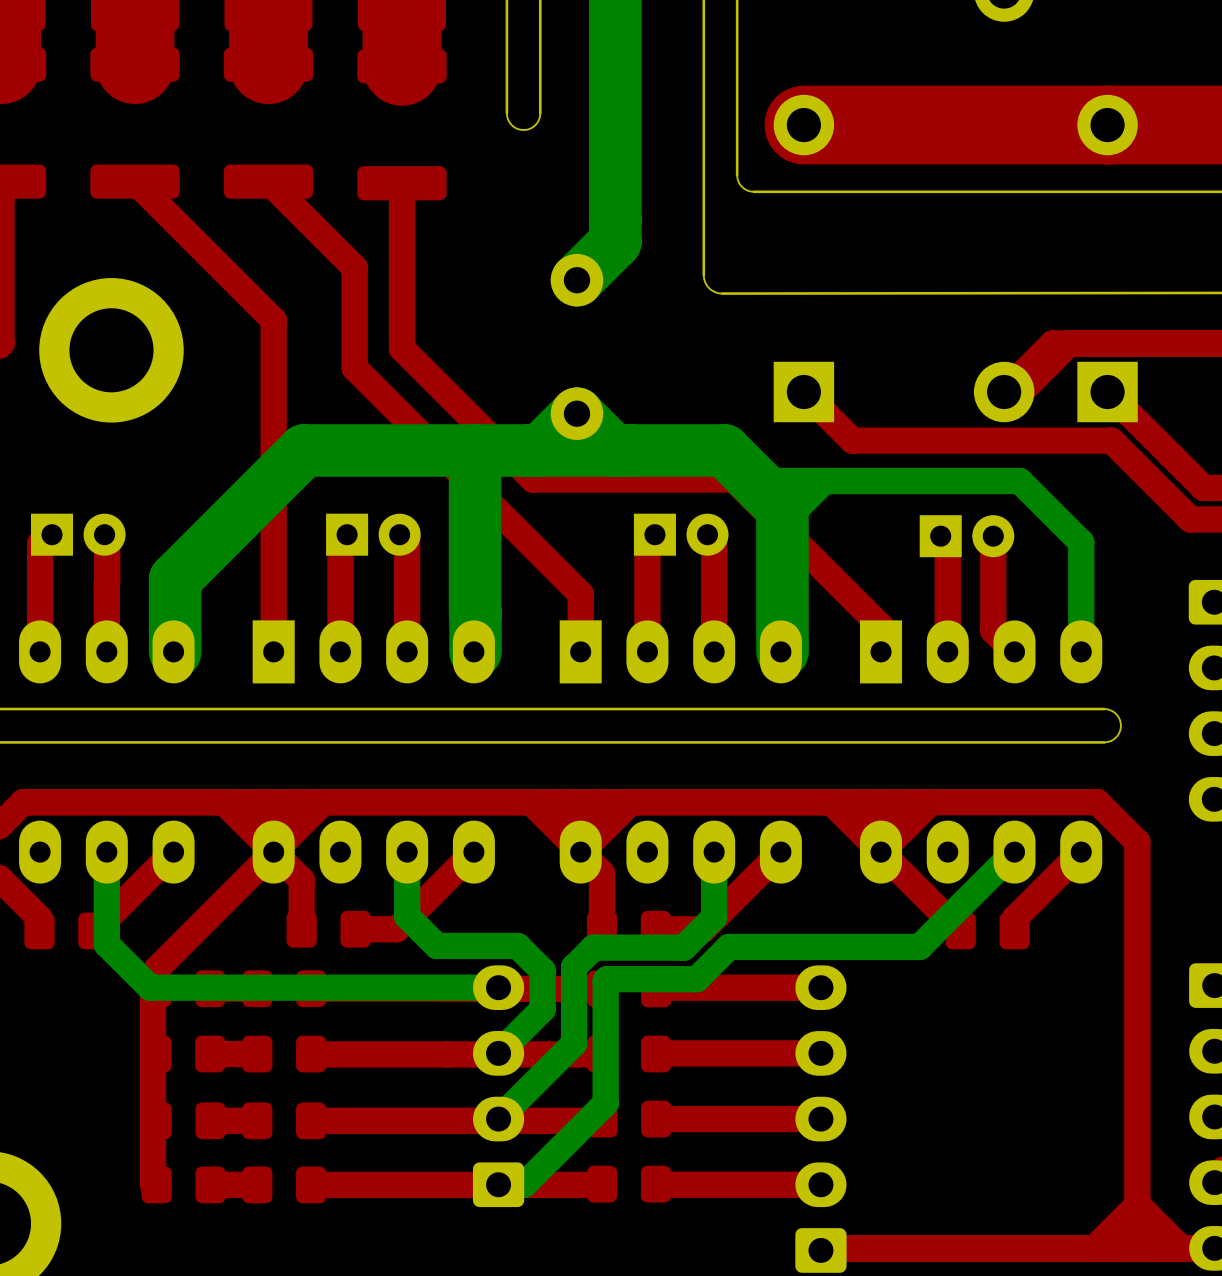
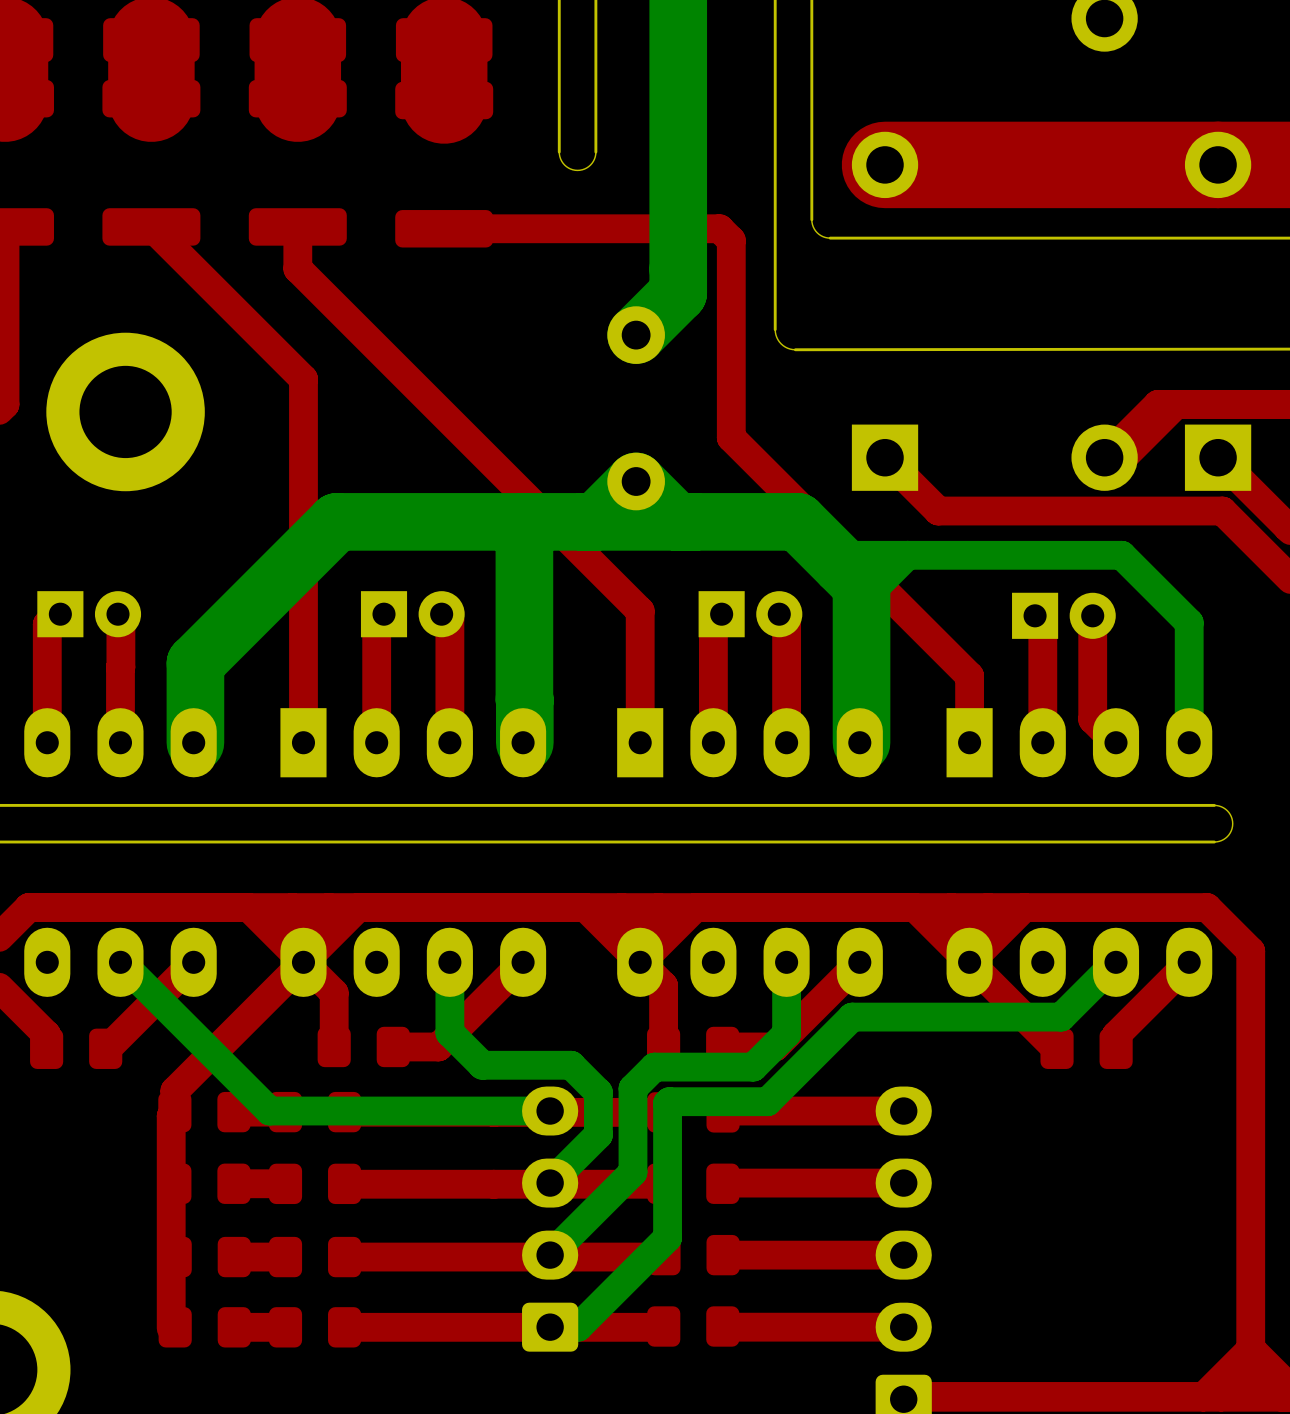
top track: (268, 181) (354, 267) (354, 368) (580, 594) -> (297, 226) (297, 268) (640, 611) (640, 679)
top track: (401, 183) (401, 348) (533, 479) (733, 479) (881, 626) -> (444, 228) (719, 228) (731, 240) (731, 437) (969, 676) (969, 714)
bottom track: (106, 852) (106, 944) (150, 987) (242, 987) -> (121, 962) (269, 1111)
bottom track: (964, 902) (919, 946) (729, 946) -> (1061, 1017) (852, 1017) (802, 1066)

